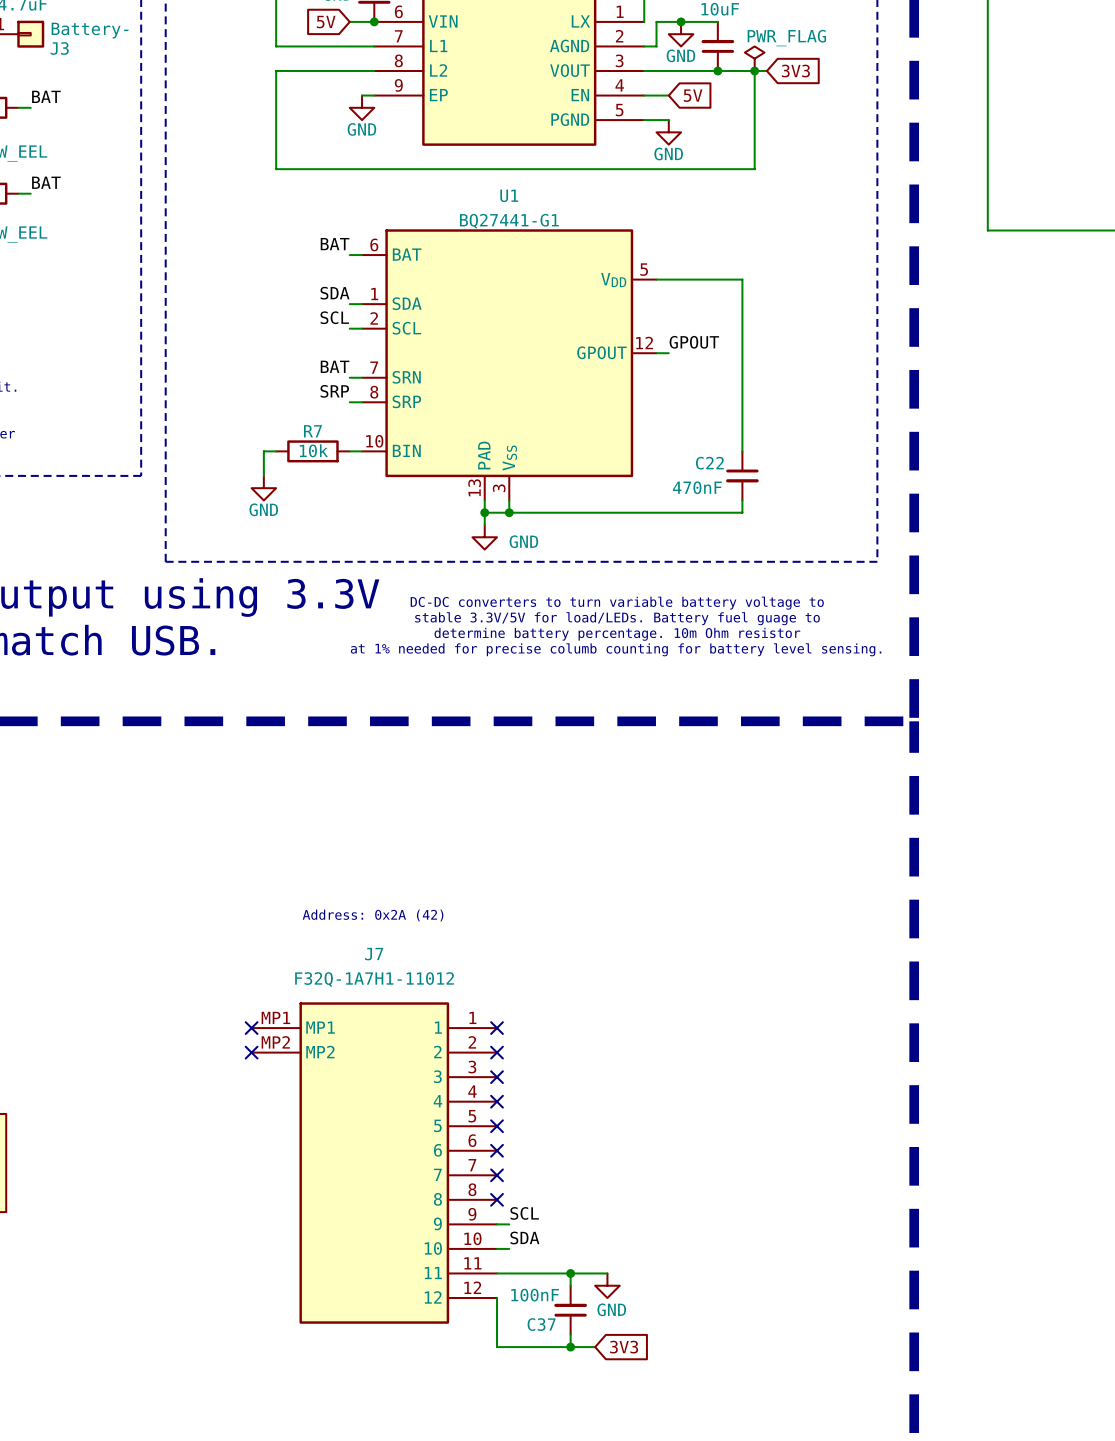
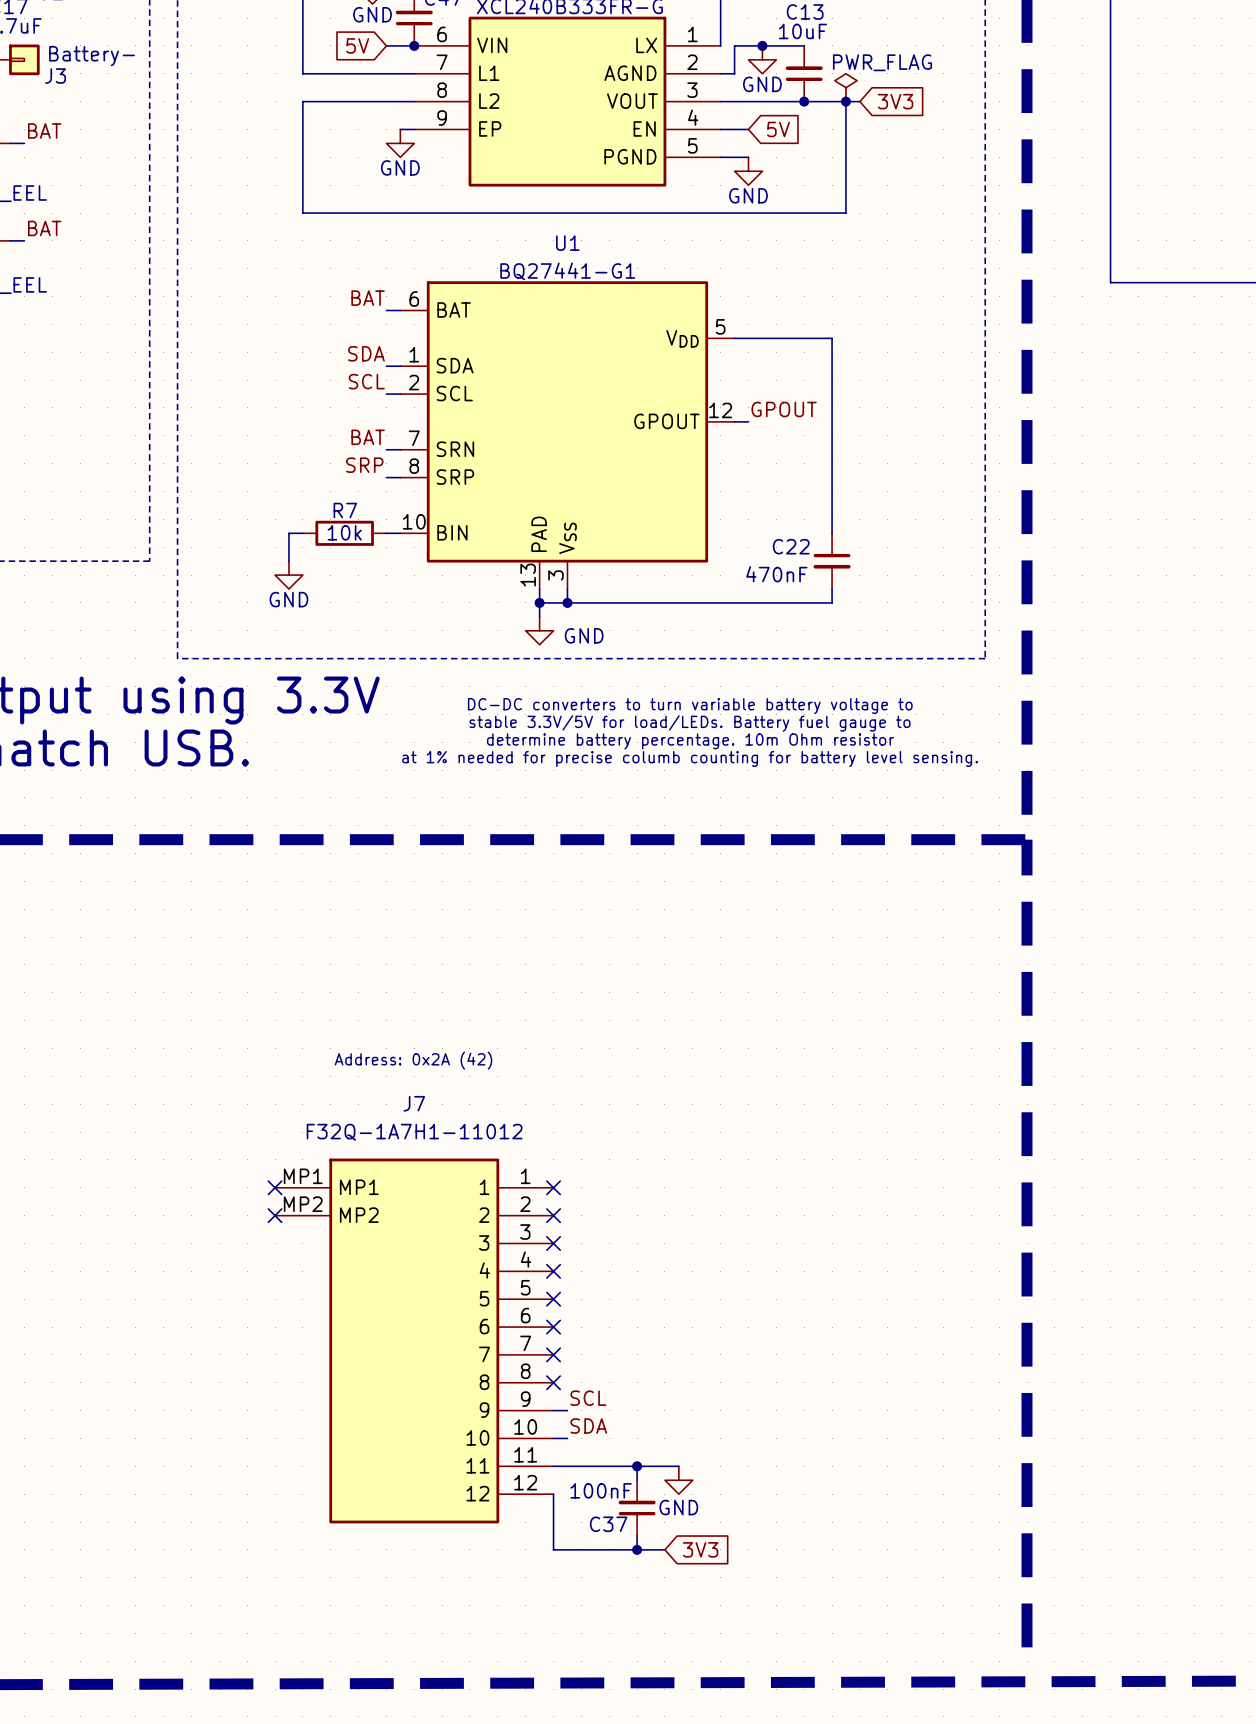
text: stable 3.3V/5V for load/LEDs. Battery fuel guage to (617, 618) -> stable 3.3V/5V for load/LEDs. Battery fuel gauge to (690, 723)

